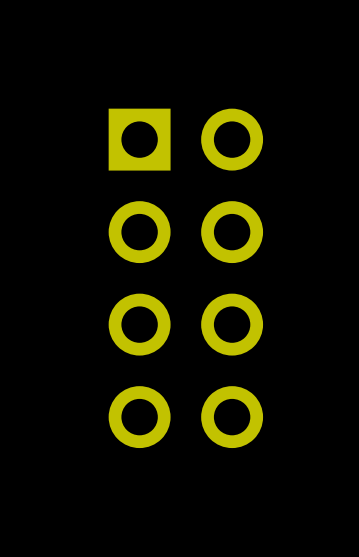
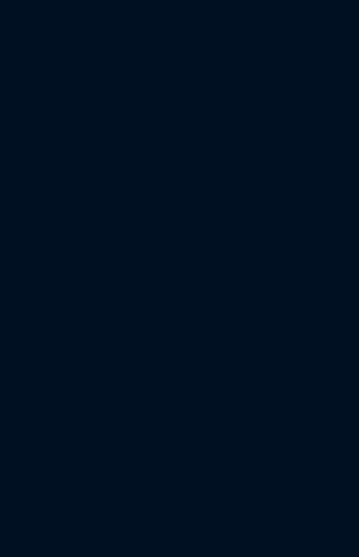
part: (185, 278) -> none

